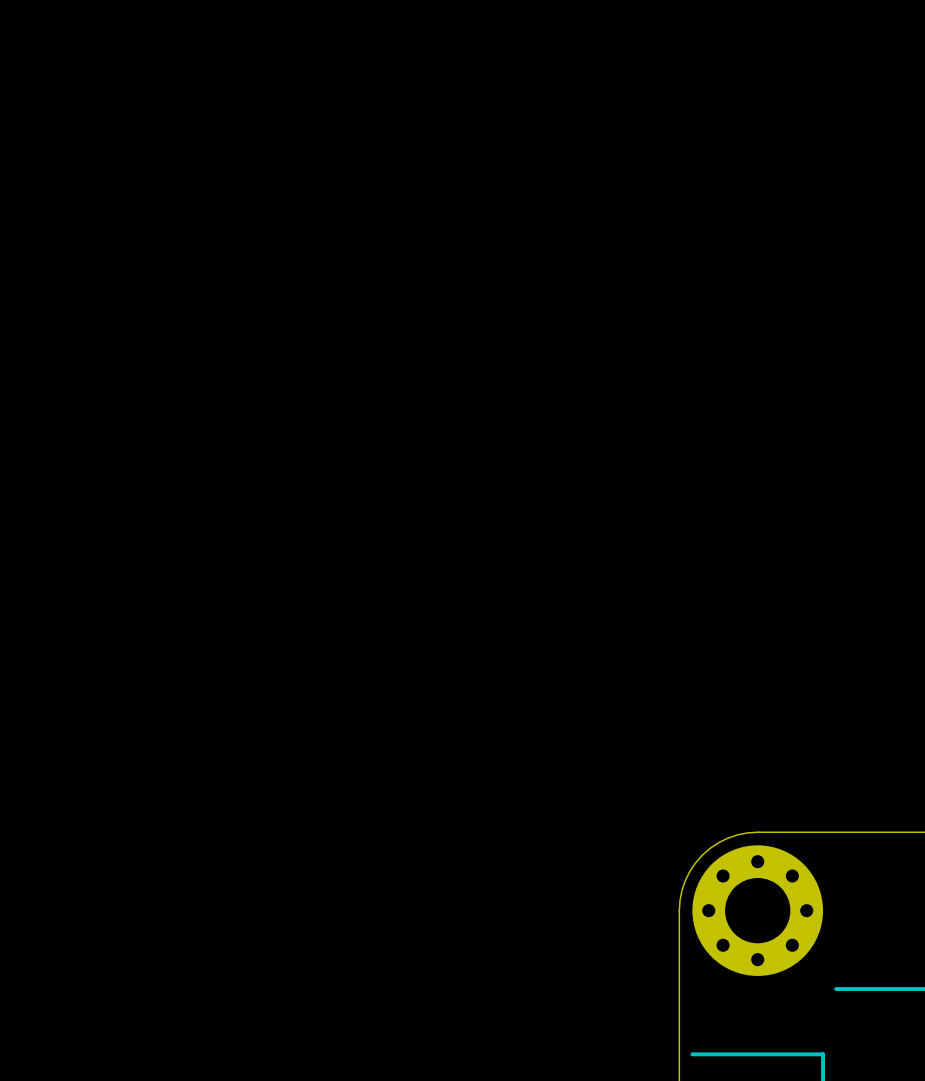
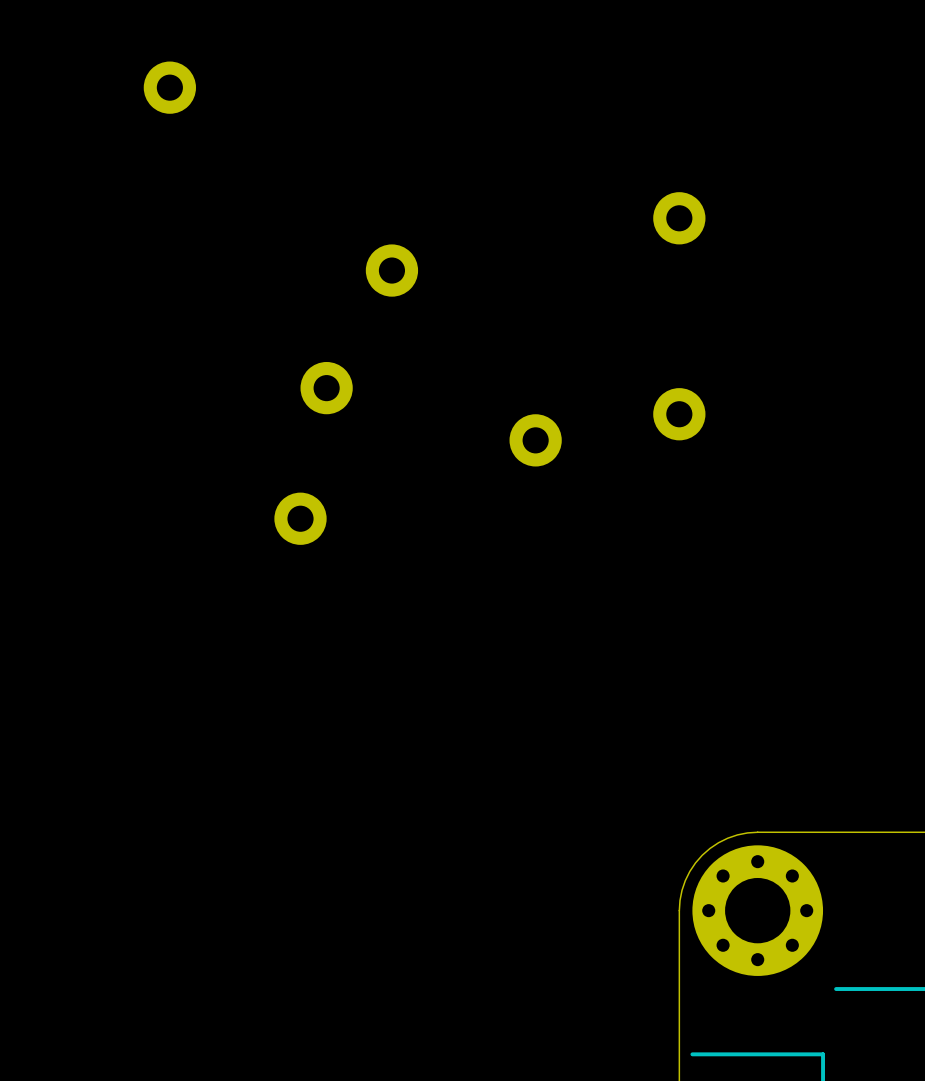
part: none -> (169, 87)
part: none -> (679, 218)
part: none -> (391, 270)
part: none -> (326, 388)
part: none -> (679, 414)
part: none -> (535, 440)
part: none -> (300, 518)

